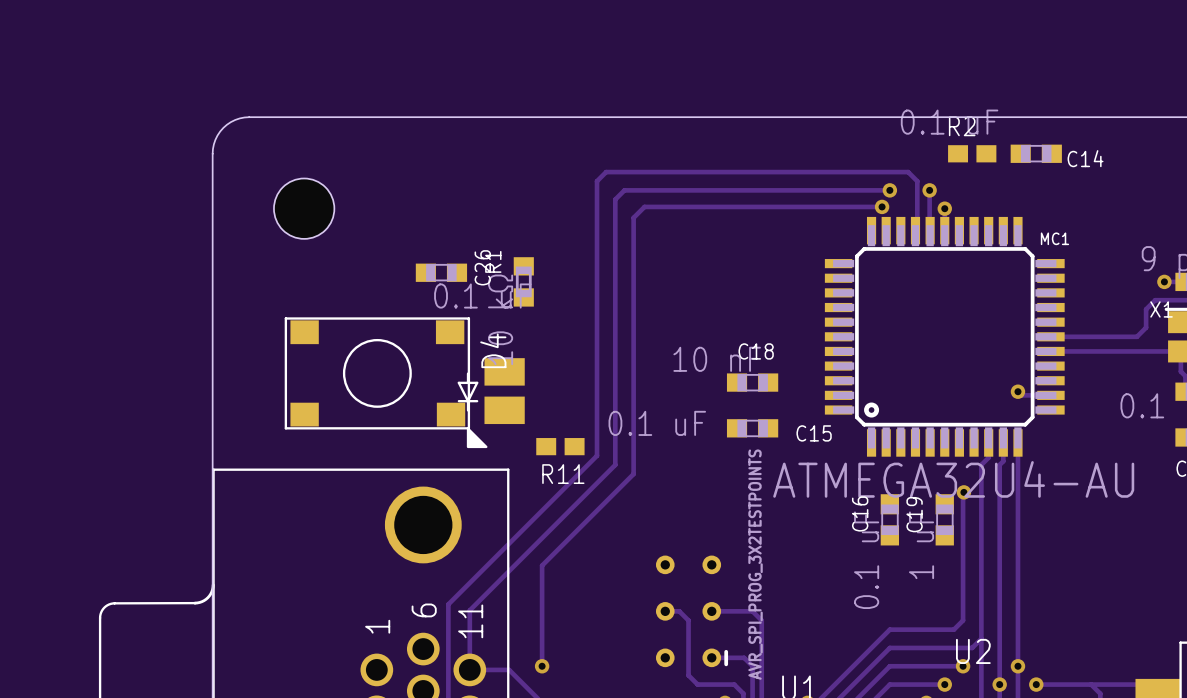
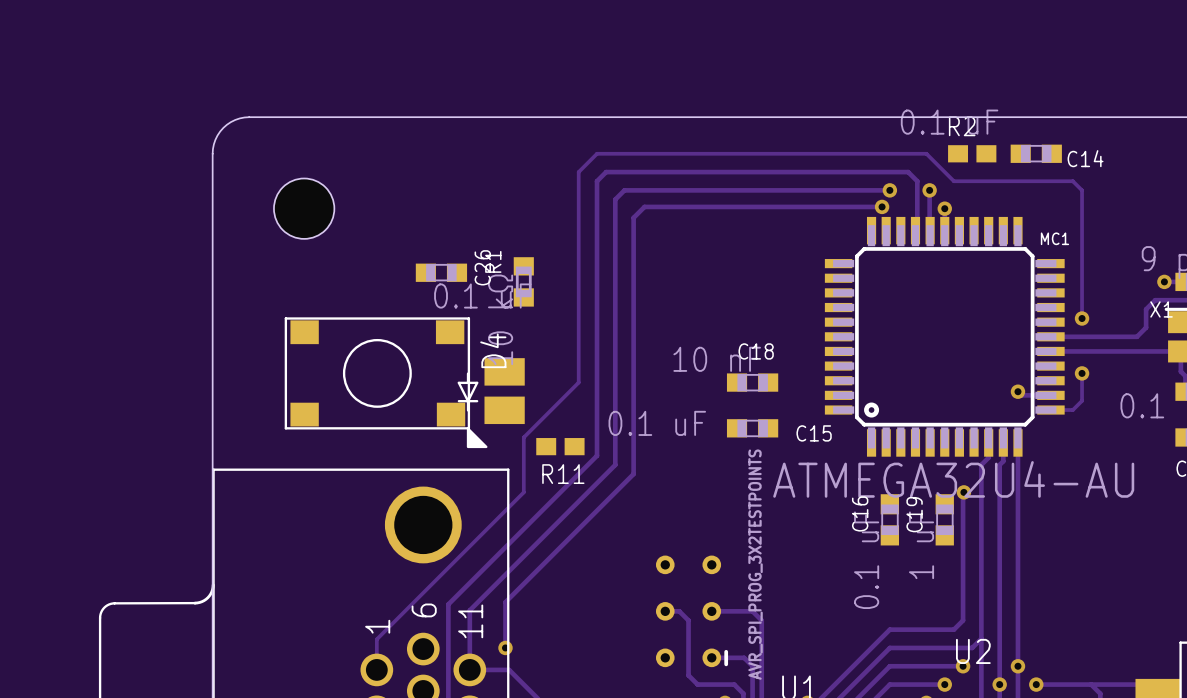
track: none -> (1082, 318) (1082, 190) (1072, 181) (953, 181) (926, 153) (597, 153) (578, 172) (578, 382) (523, 437) (523, 492) (376, 639) (376, 669)
via: none -> (1082, 318)
track: none -> (1082, 373) (1082, 400) (1072, 410) (1050, 410)
via: none -> (1082, 373)
track: (542, 565) (542, 666) -> (542, 565) (505, 602) (505, 647)
via position: (542, 666) -> (505, 647)

